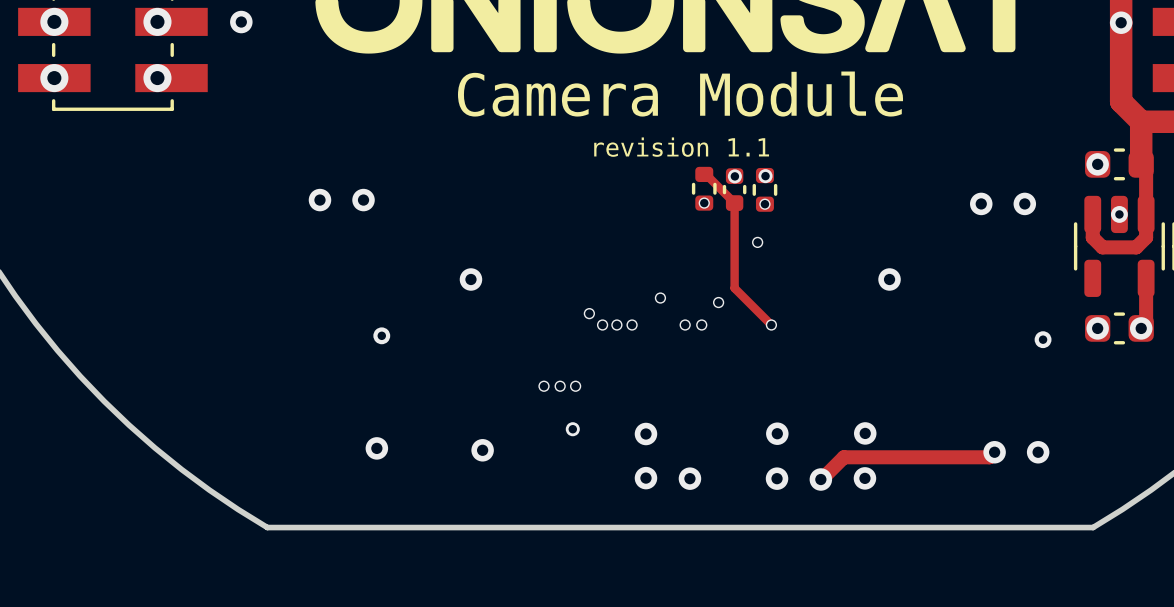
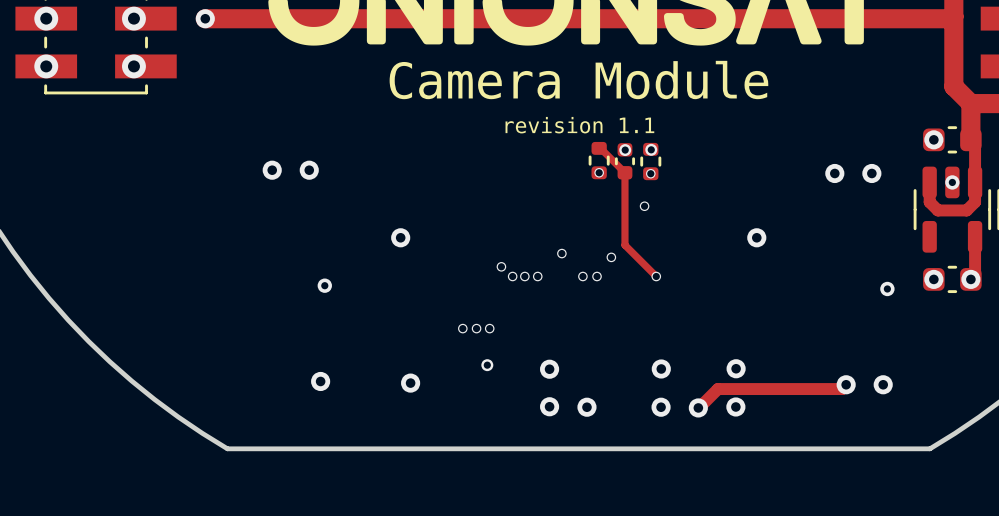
track: none -> (953, 16) (951, 18) (205, 18)
via: (1121, 22) -> none

